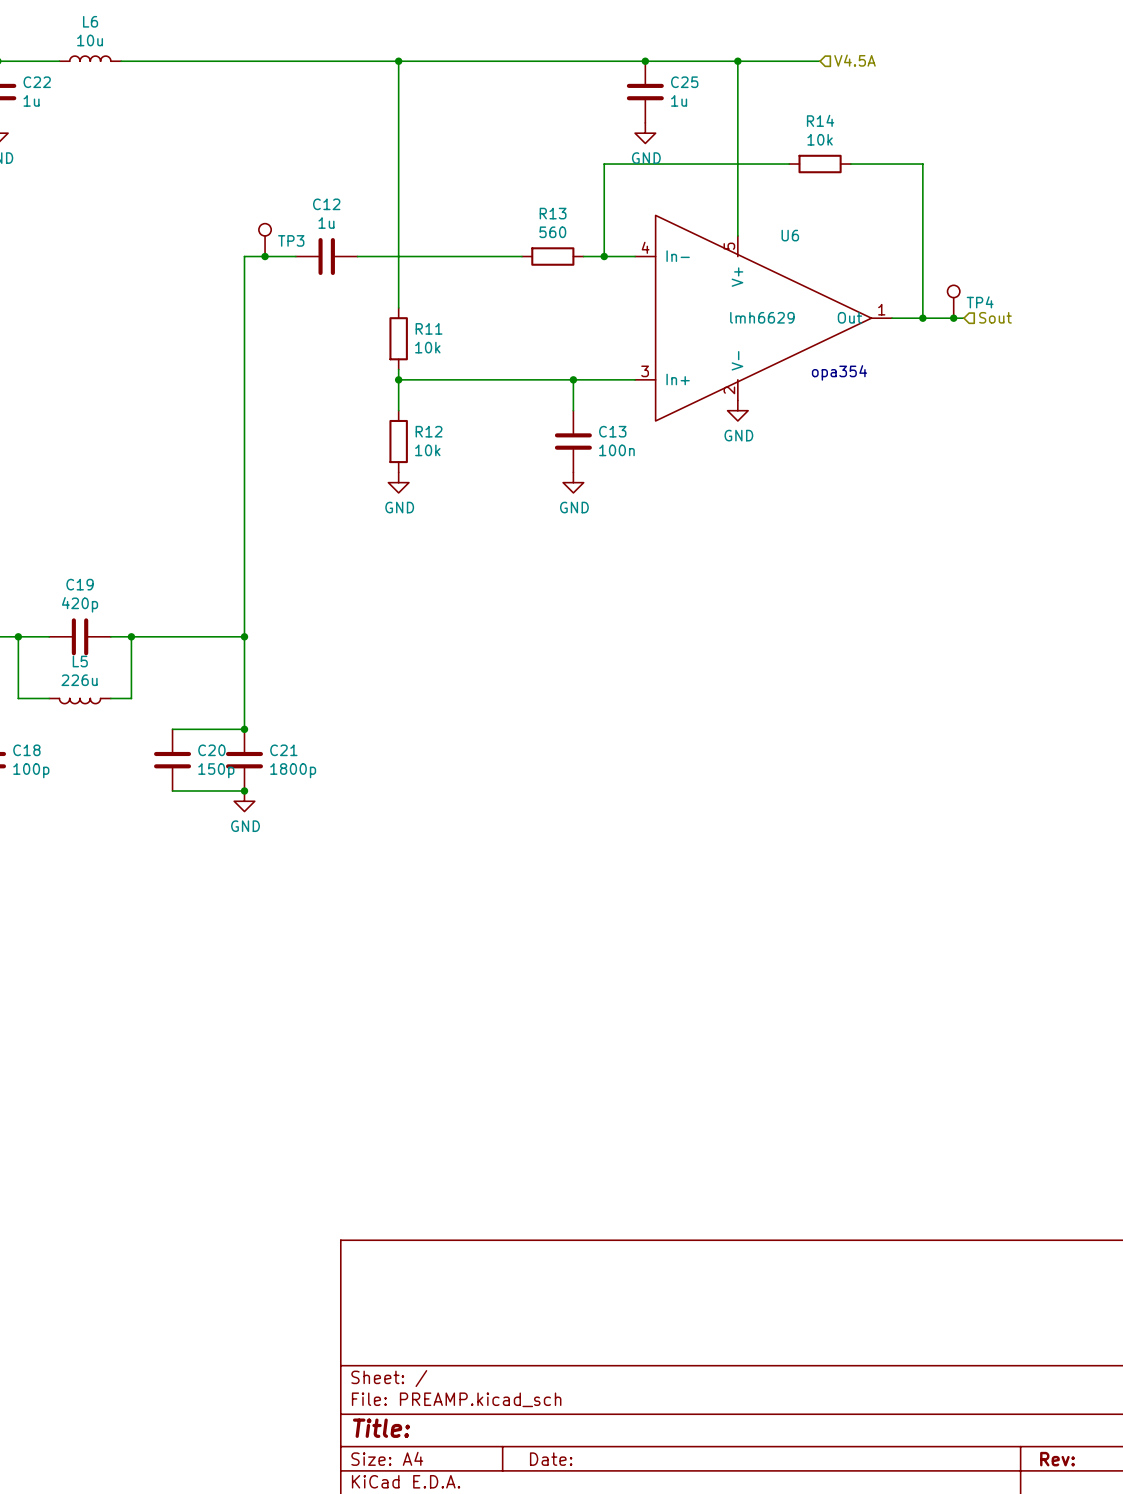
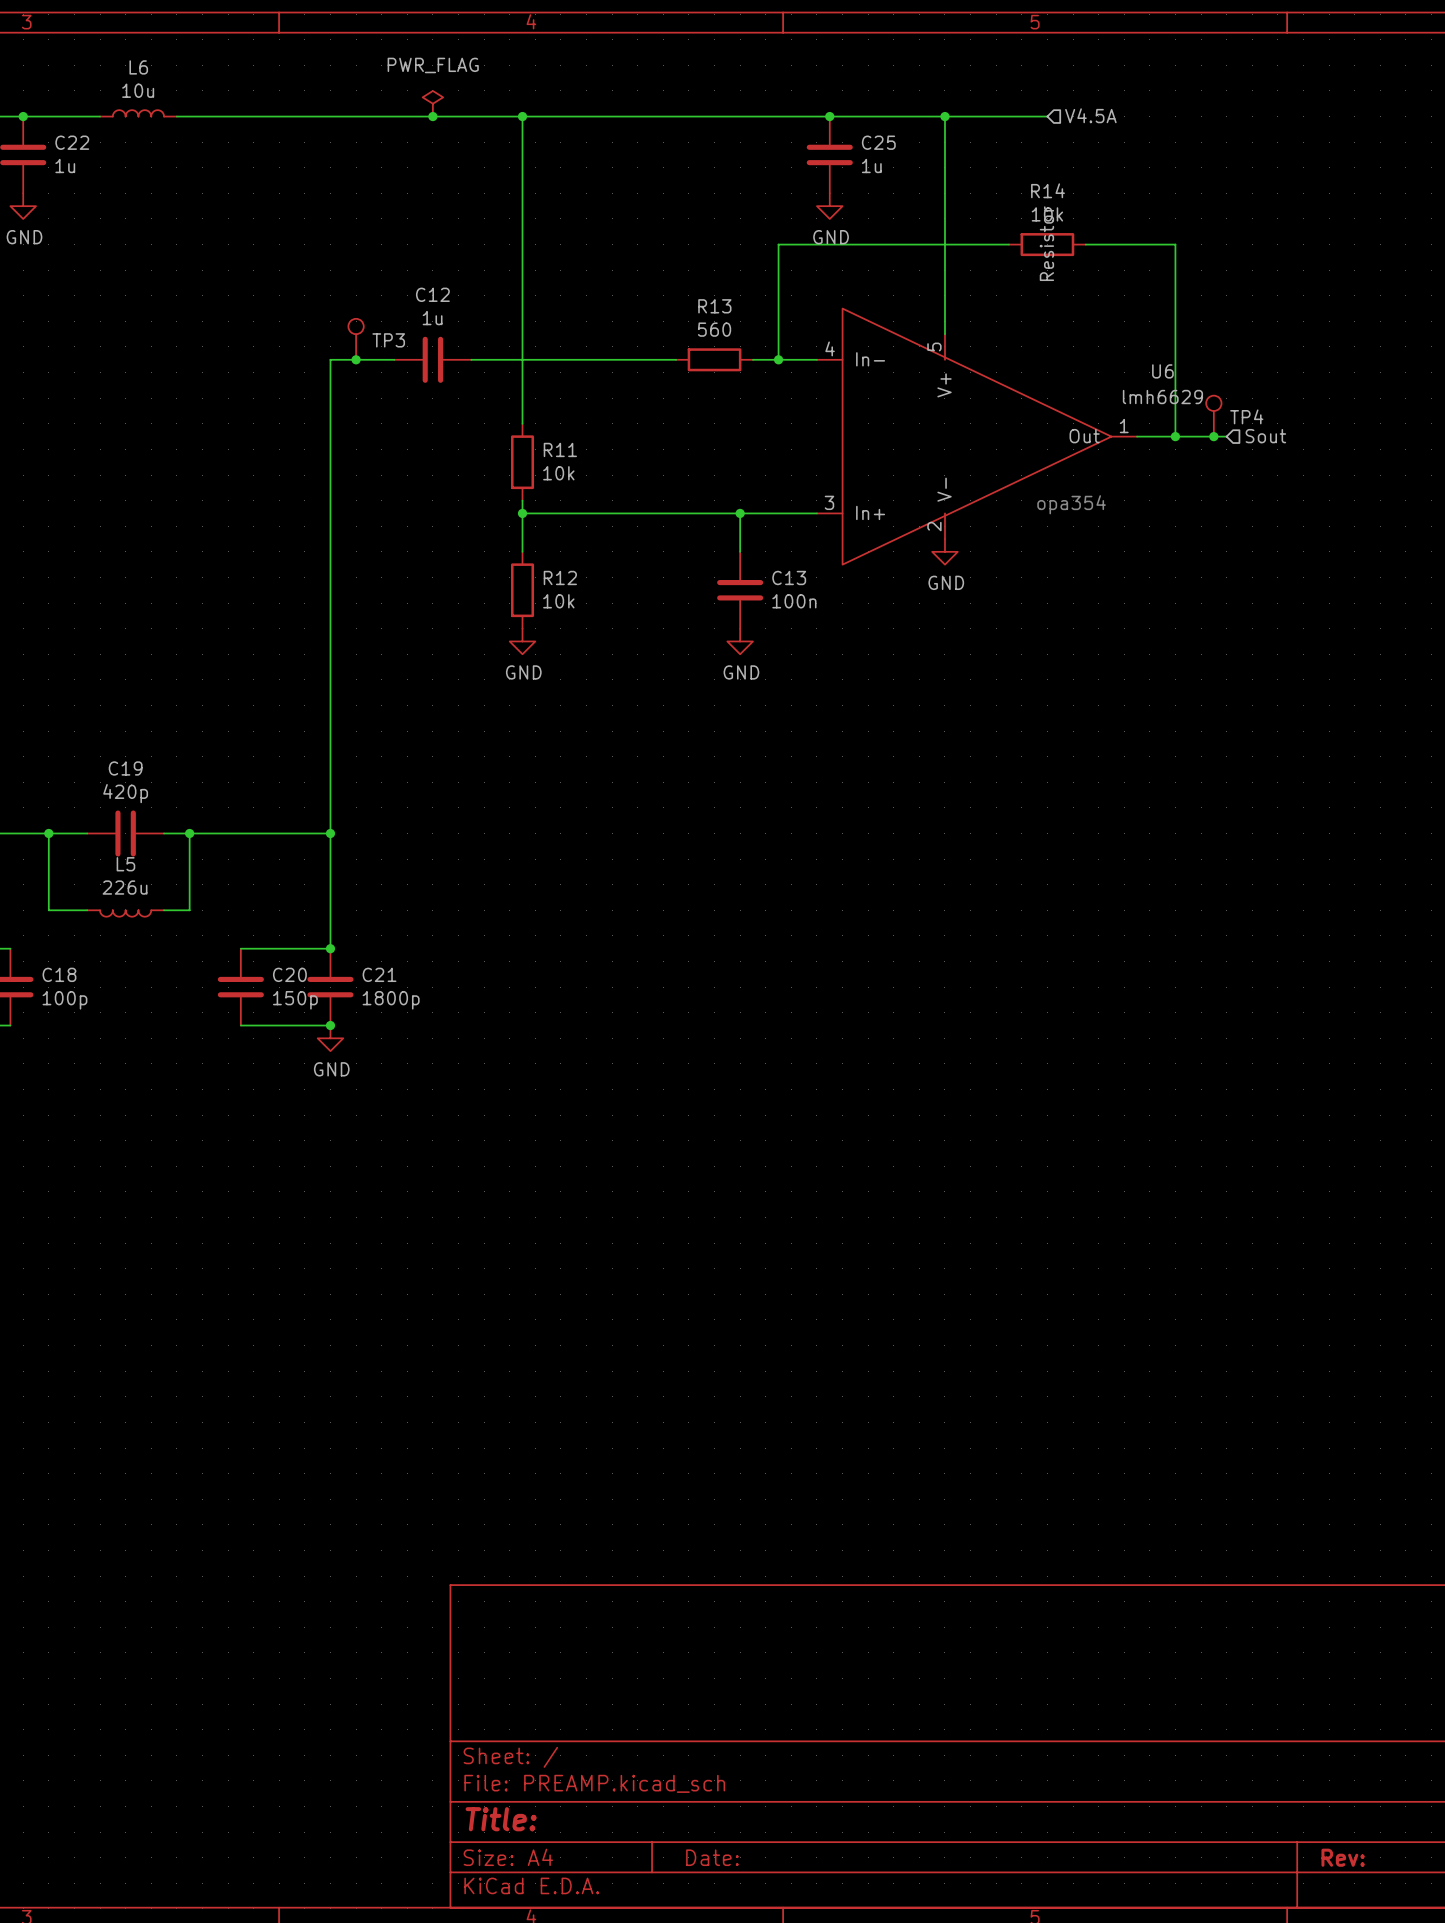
power symbol: none -> PWR_FLAG (432, 103)
junction: none -> (432, 116)
R14 text: none -> Resistor (1046, 243)
U6 name position: U6 (790, 235) -> U6 (1162, 371)
U6 value position: lmh6629 (762, 317) -> lmh6629 (1162, 397)

